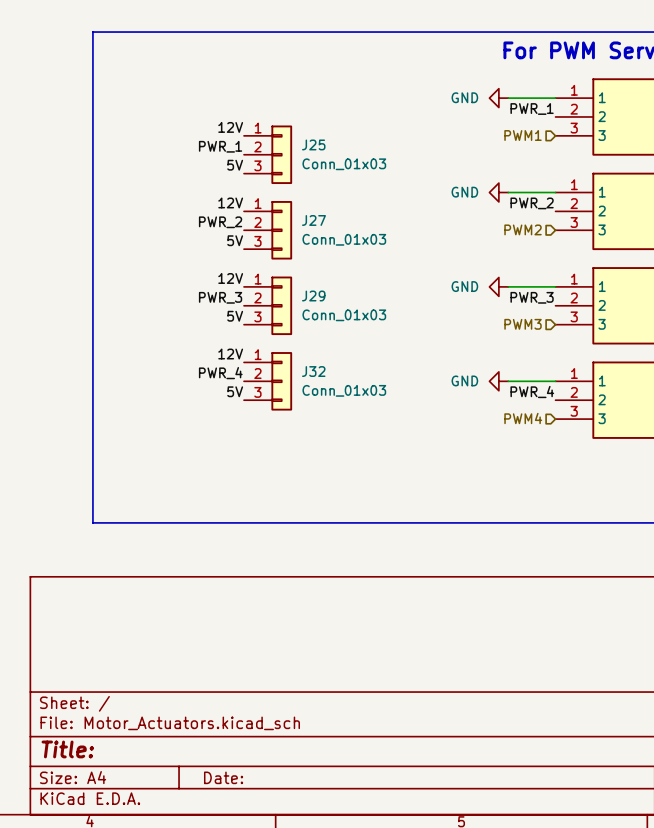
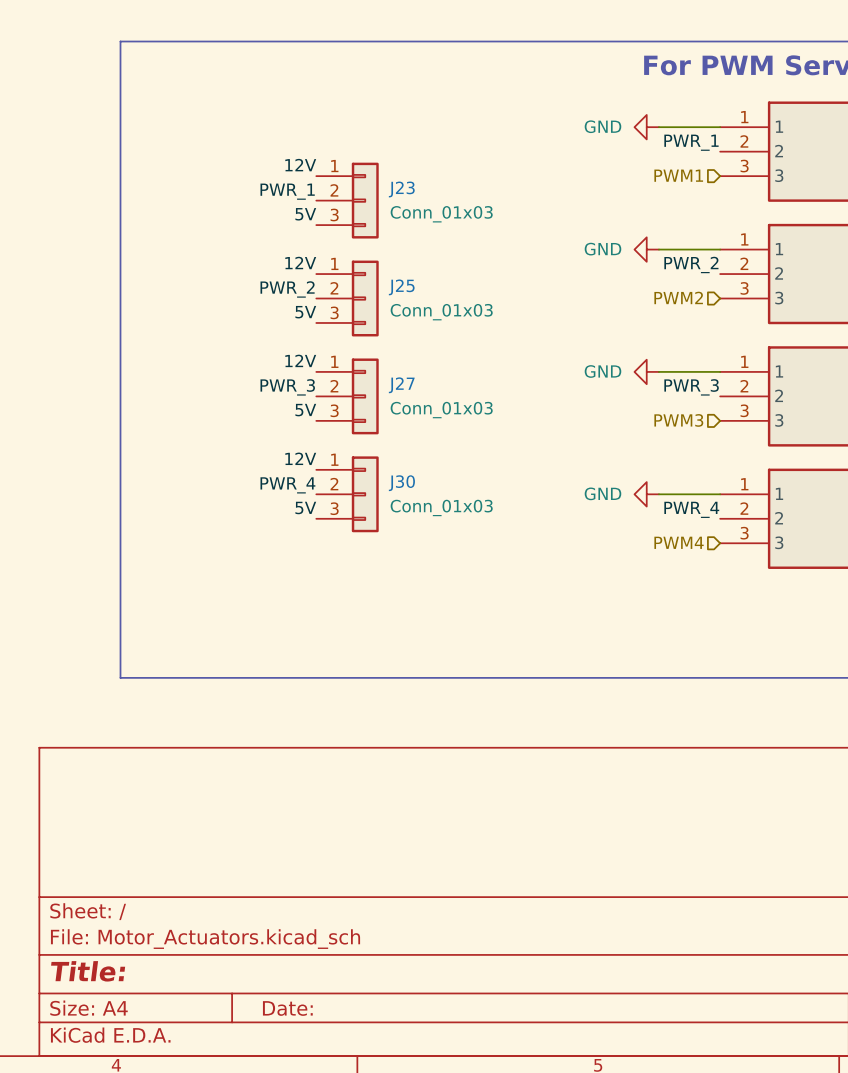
J25 name: J25 (313, 144) -> J23 (401, 189)
J27 name: J27 (313, 220) -> J25 (401, 287)
J29 name: J29 (313, 296) -> J27 (401, 385)
J32 name: J32 (313, 371) -> J30 (401, 483)

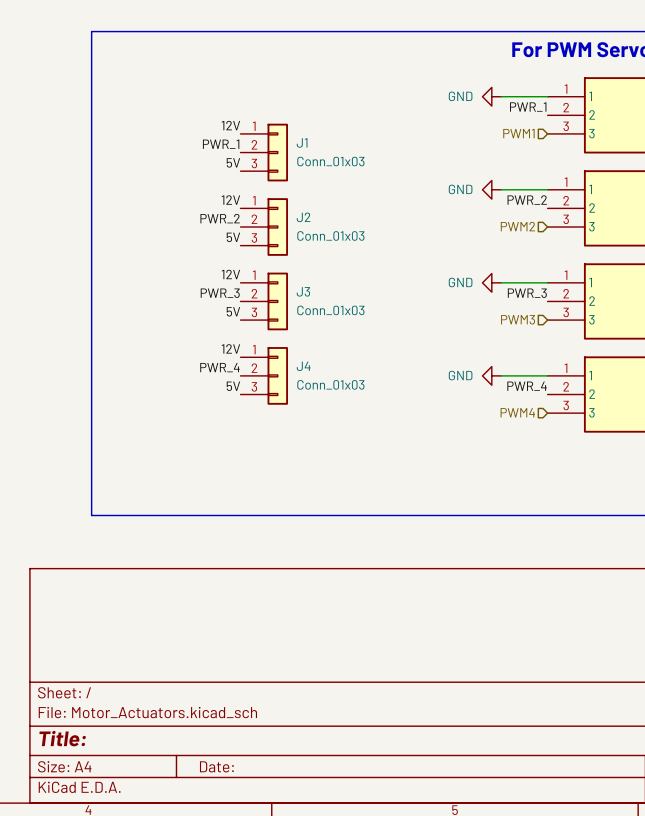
J23 name: J23 (401, 189) -> J1 (302, 142)
J25 name: J25 (401, 287) -> J2 (303, 217)
J27 name: J27 (401, 385) -> J3 (303, 291)
J30 name: J30 (401, 483) -> J4 (303, 366)

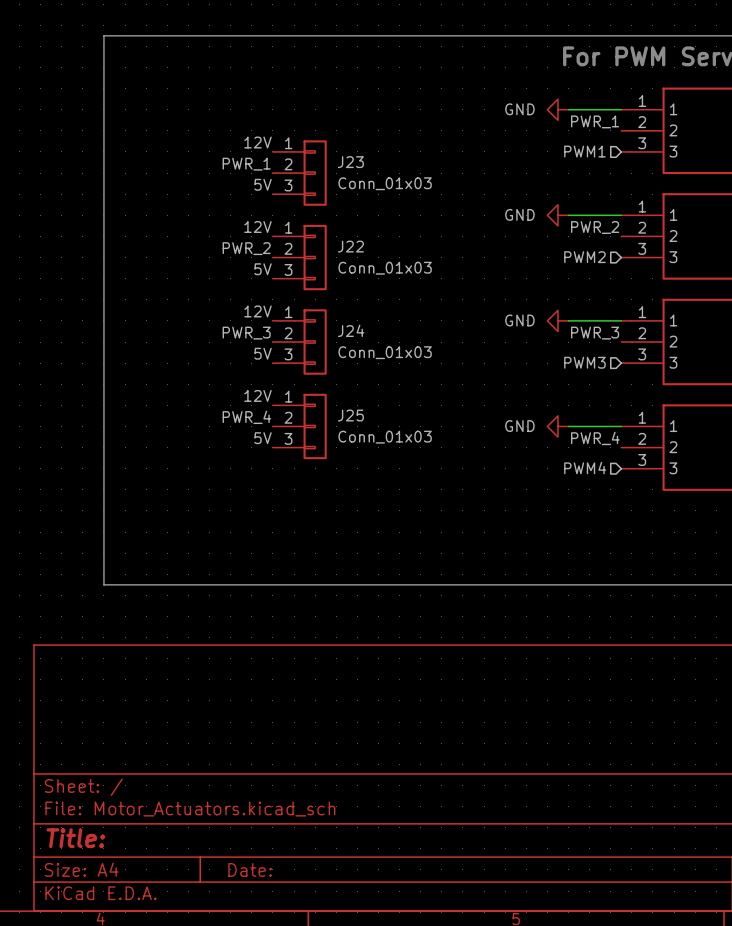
J1 name: J1 (302, 142) -> J23 (350, 162)
J2 name: J2 (303, 217) -> J22 (350, 246)
J3 name: J3 (303, 291) -> J24 (351, 330)
J4 name: J4 (303, 366) -> J25 (350, 415)

